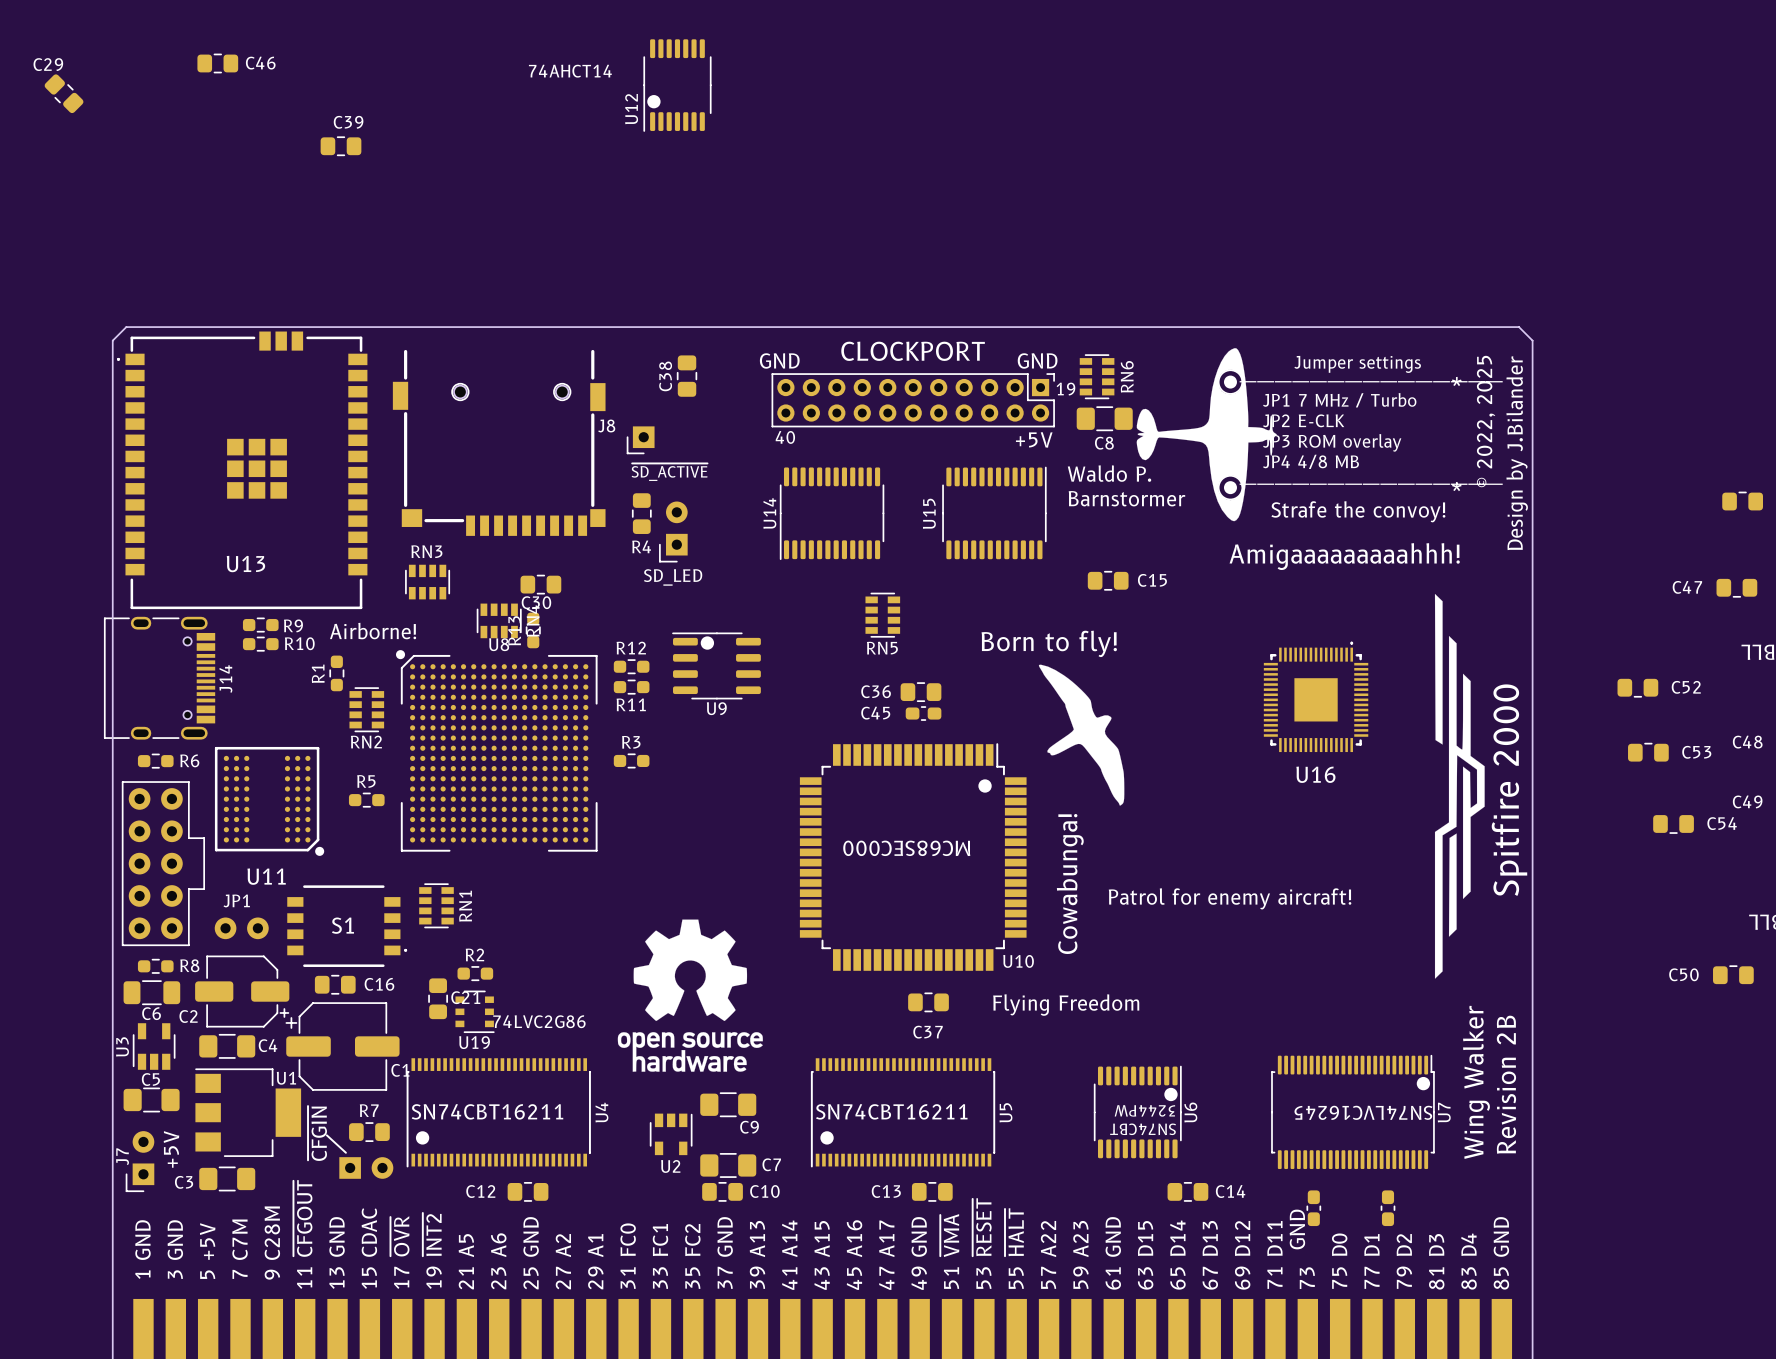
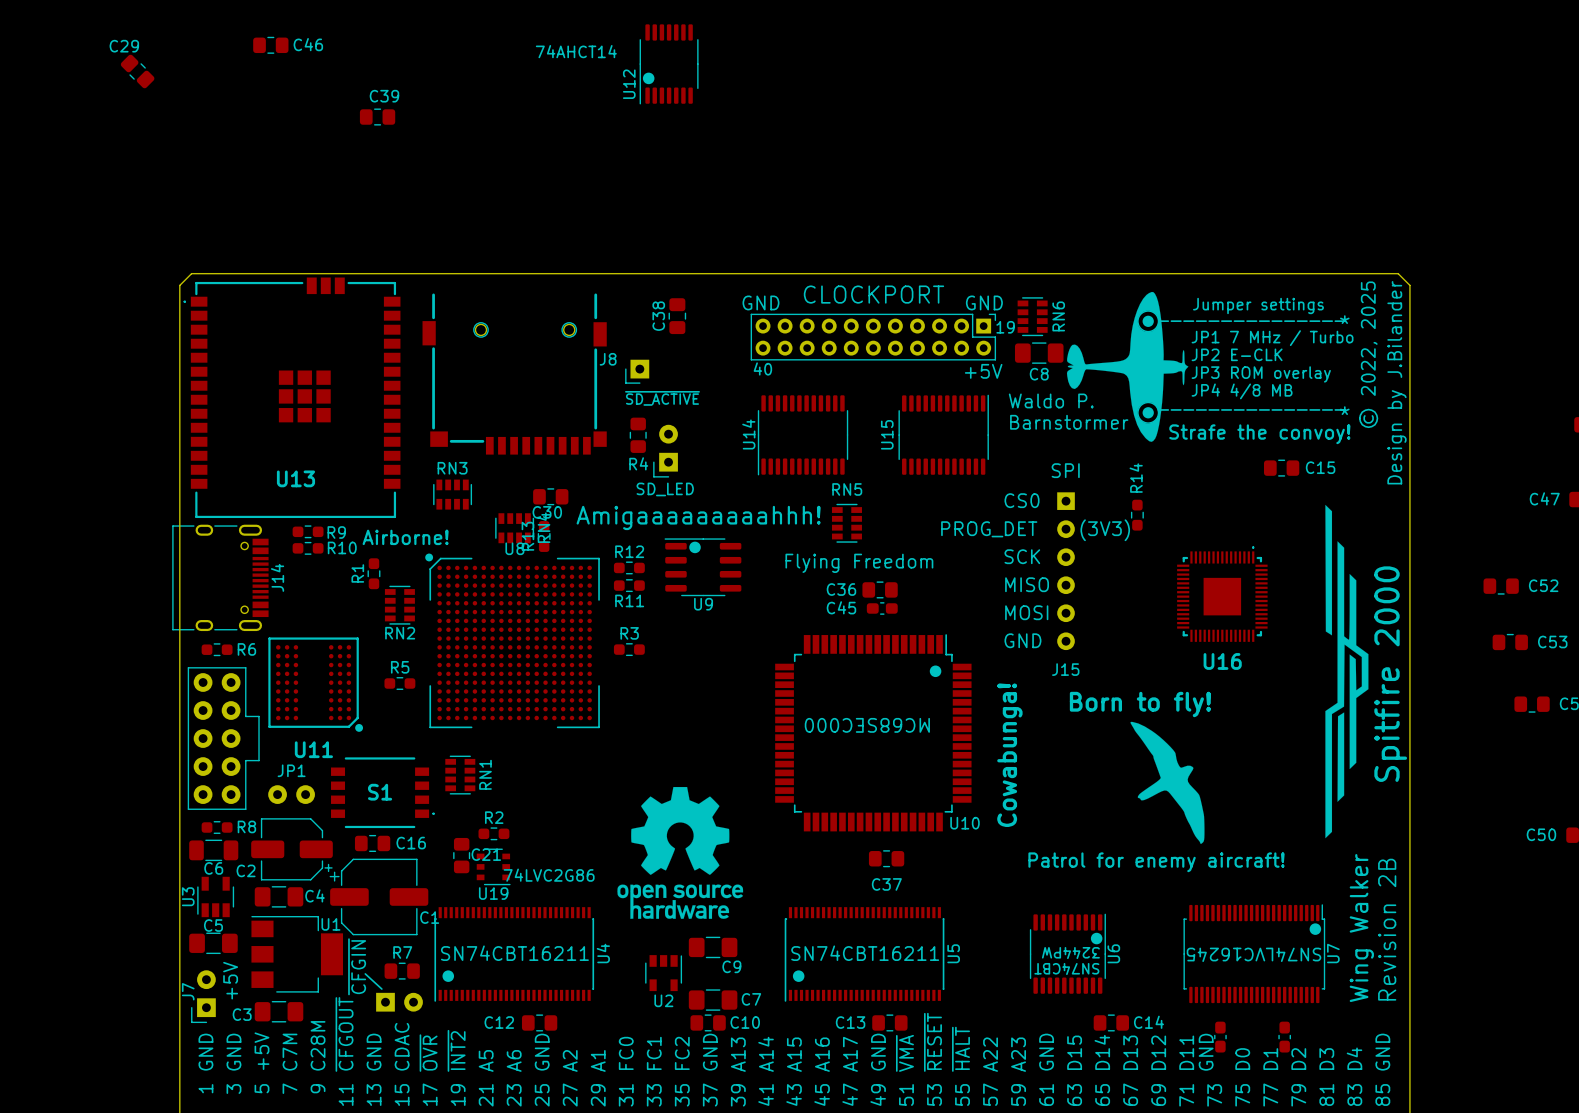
text: none -> SPI (1065, 470)
text: Amigaaaaaaaaahhh! (1344, 556) -> none
C15 position: (1108, 580) -> (1281, 468)
text: none -> CS0 (1022, 500)
R14: none -> (1137, 515)
text: none -> Amigaaaaaaaaahhh! (698, 517)
text: none -> PROG_DET (3V3) (1035, 530)
text position: Born to fly! (1049, 643) -> Born to fly! (1140, 704)
RN5 name position: RN5 (882, 648) -> RN5 (847, 489)
text: none -> SCK (1022, 556)
text: none -> Flying Freedom (859, 563)
J15: none -> (1066, 571)
text: none -> MISO (1027, 584)
text: none -> MOSI (1026, 612)
drawing position: (1081, 735) -> (1167, 782)
text: none -> GND (1022, 640)
text position: Patrol for enemy aircraft! (1230, 898) -> Patrol for enemy aircraft! (1156, 862)
text: Flying Freedom (1066, 1005) -> none

